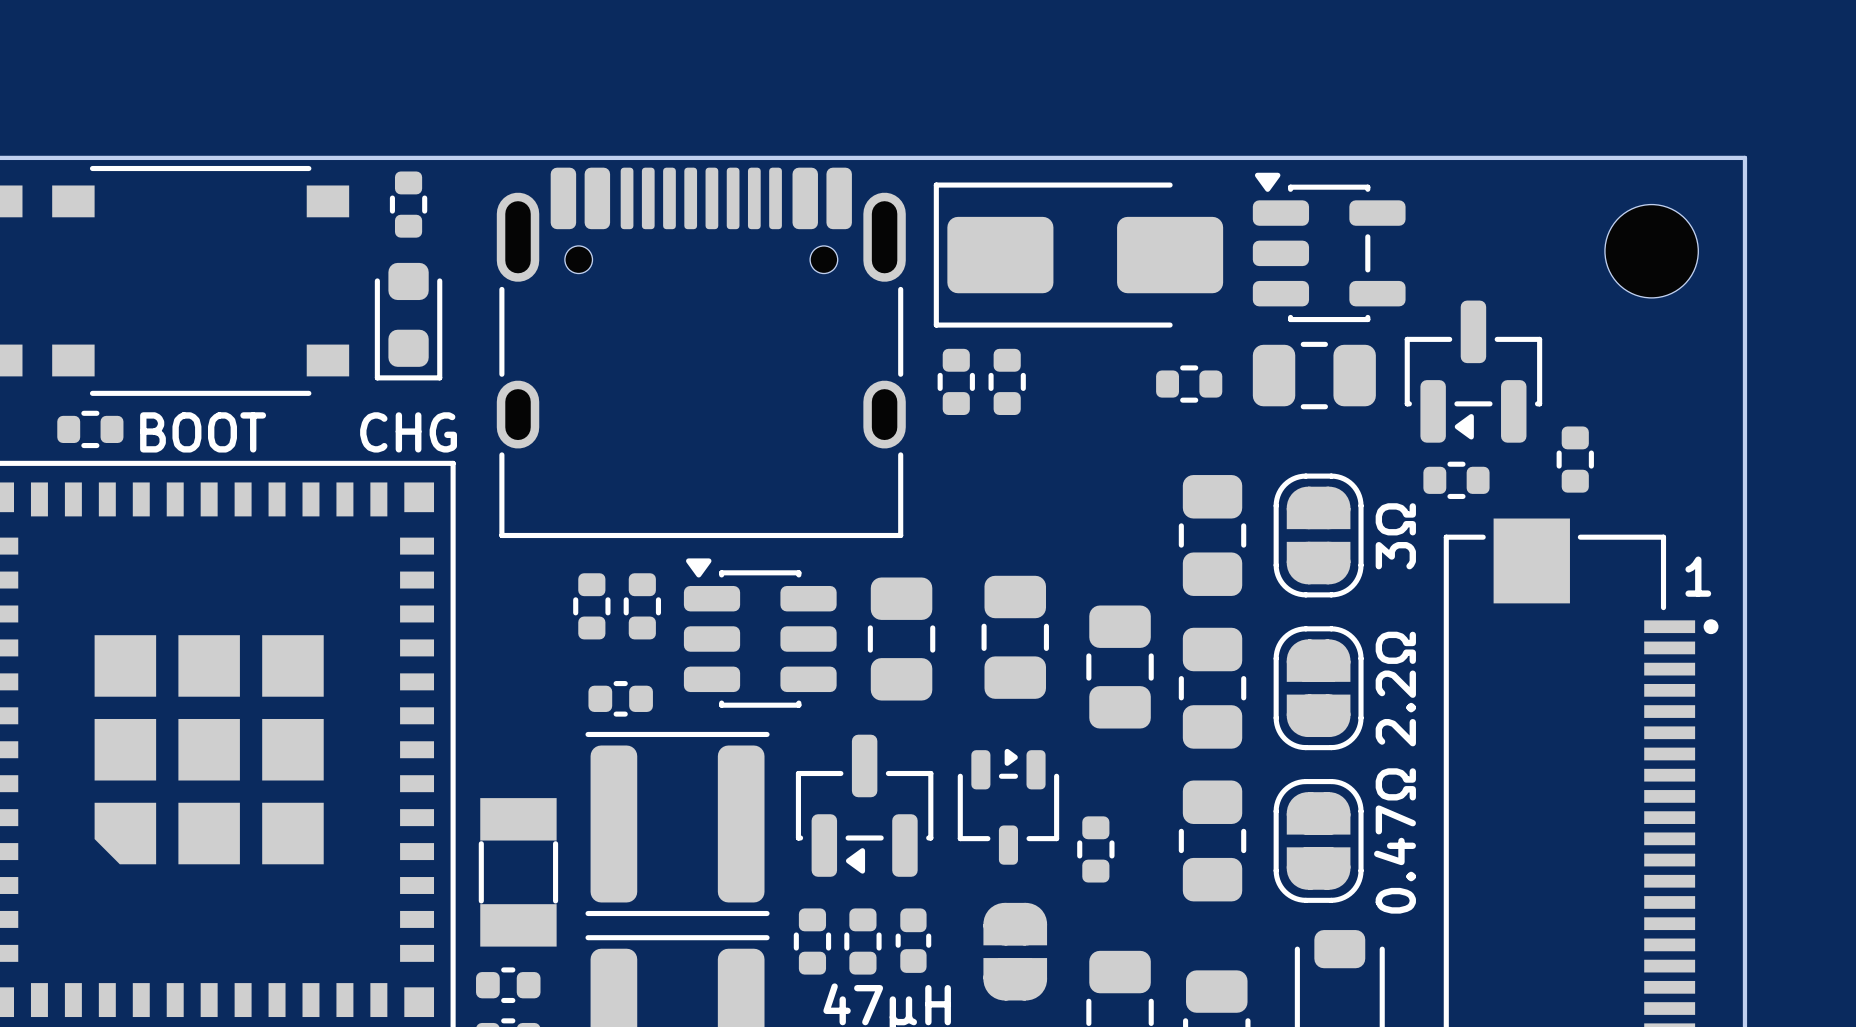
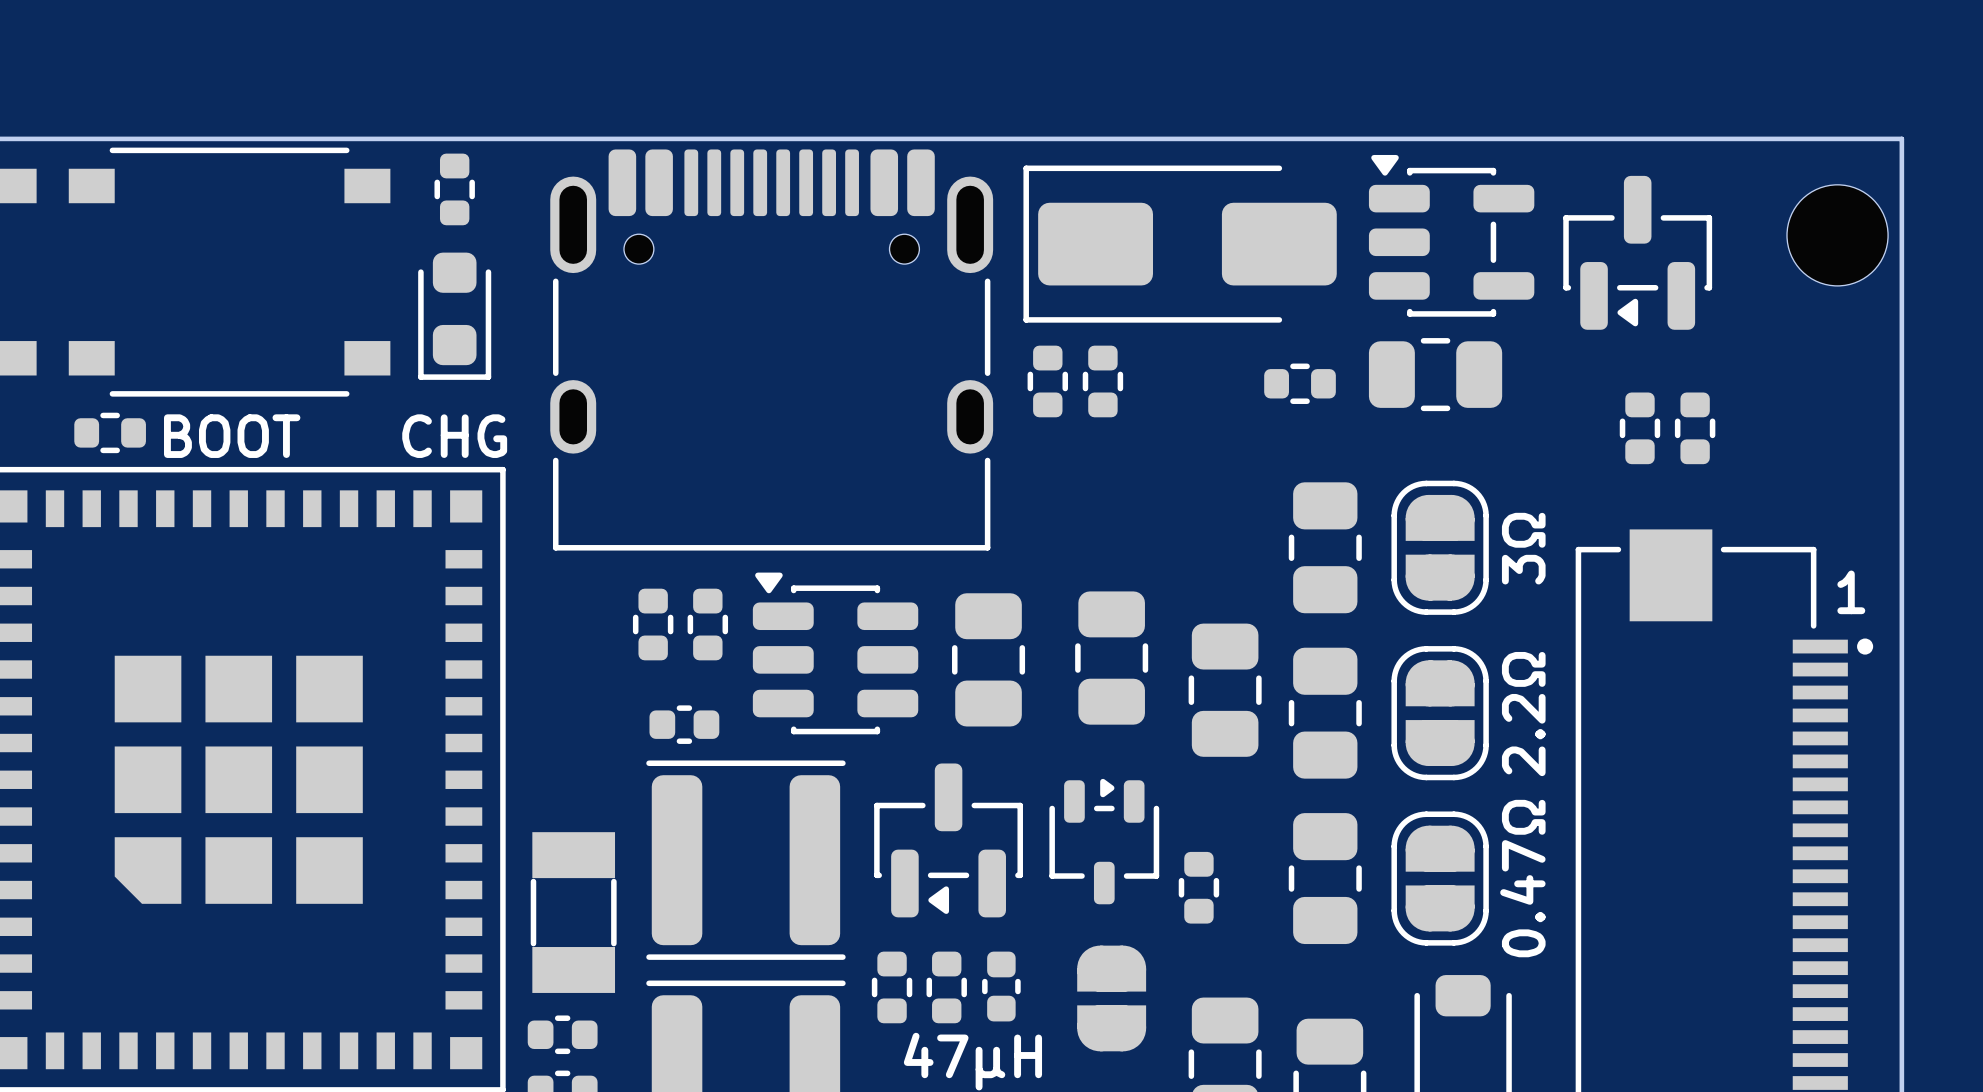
part position: (1651, 251) -> (1837, 235)
part position: (1473, 371) -> (1637, 252)
part: none -> (1639, 428)
part: none -> (1695, 428)
part: (1575, 459) -> none
part: (1456, 480) -> none

